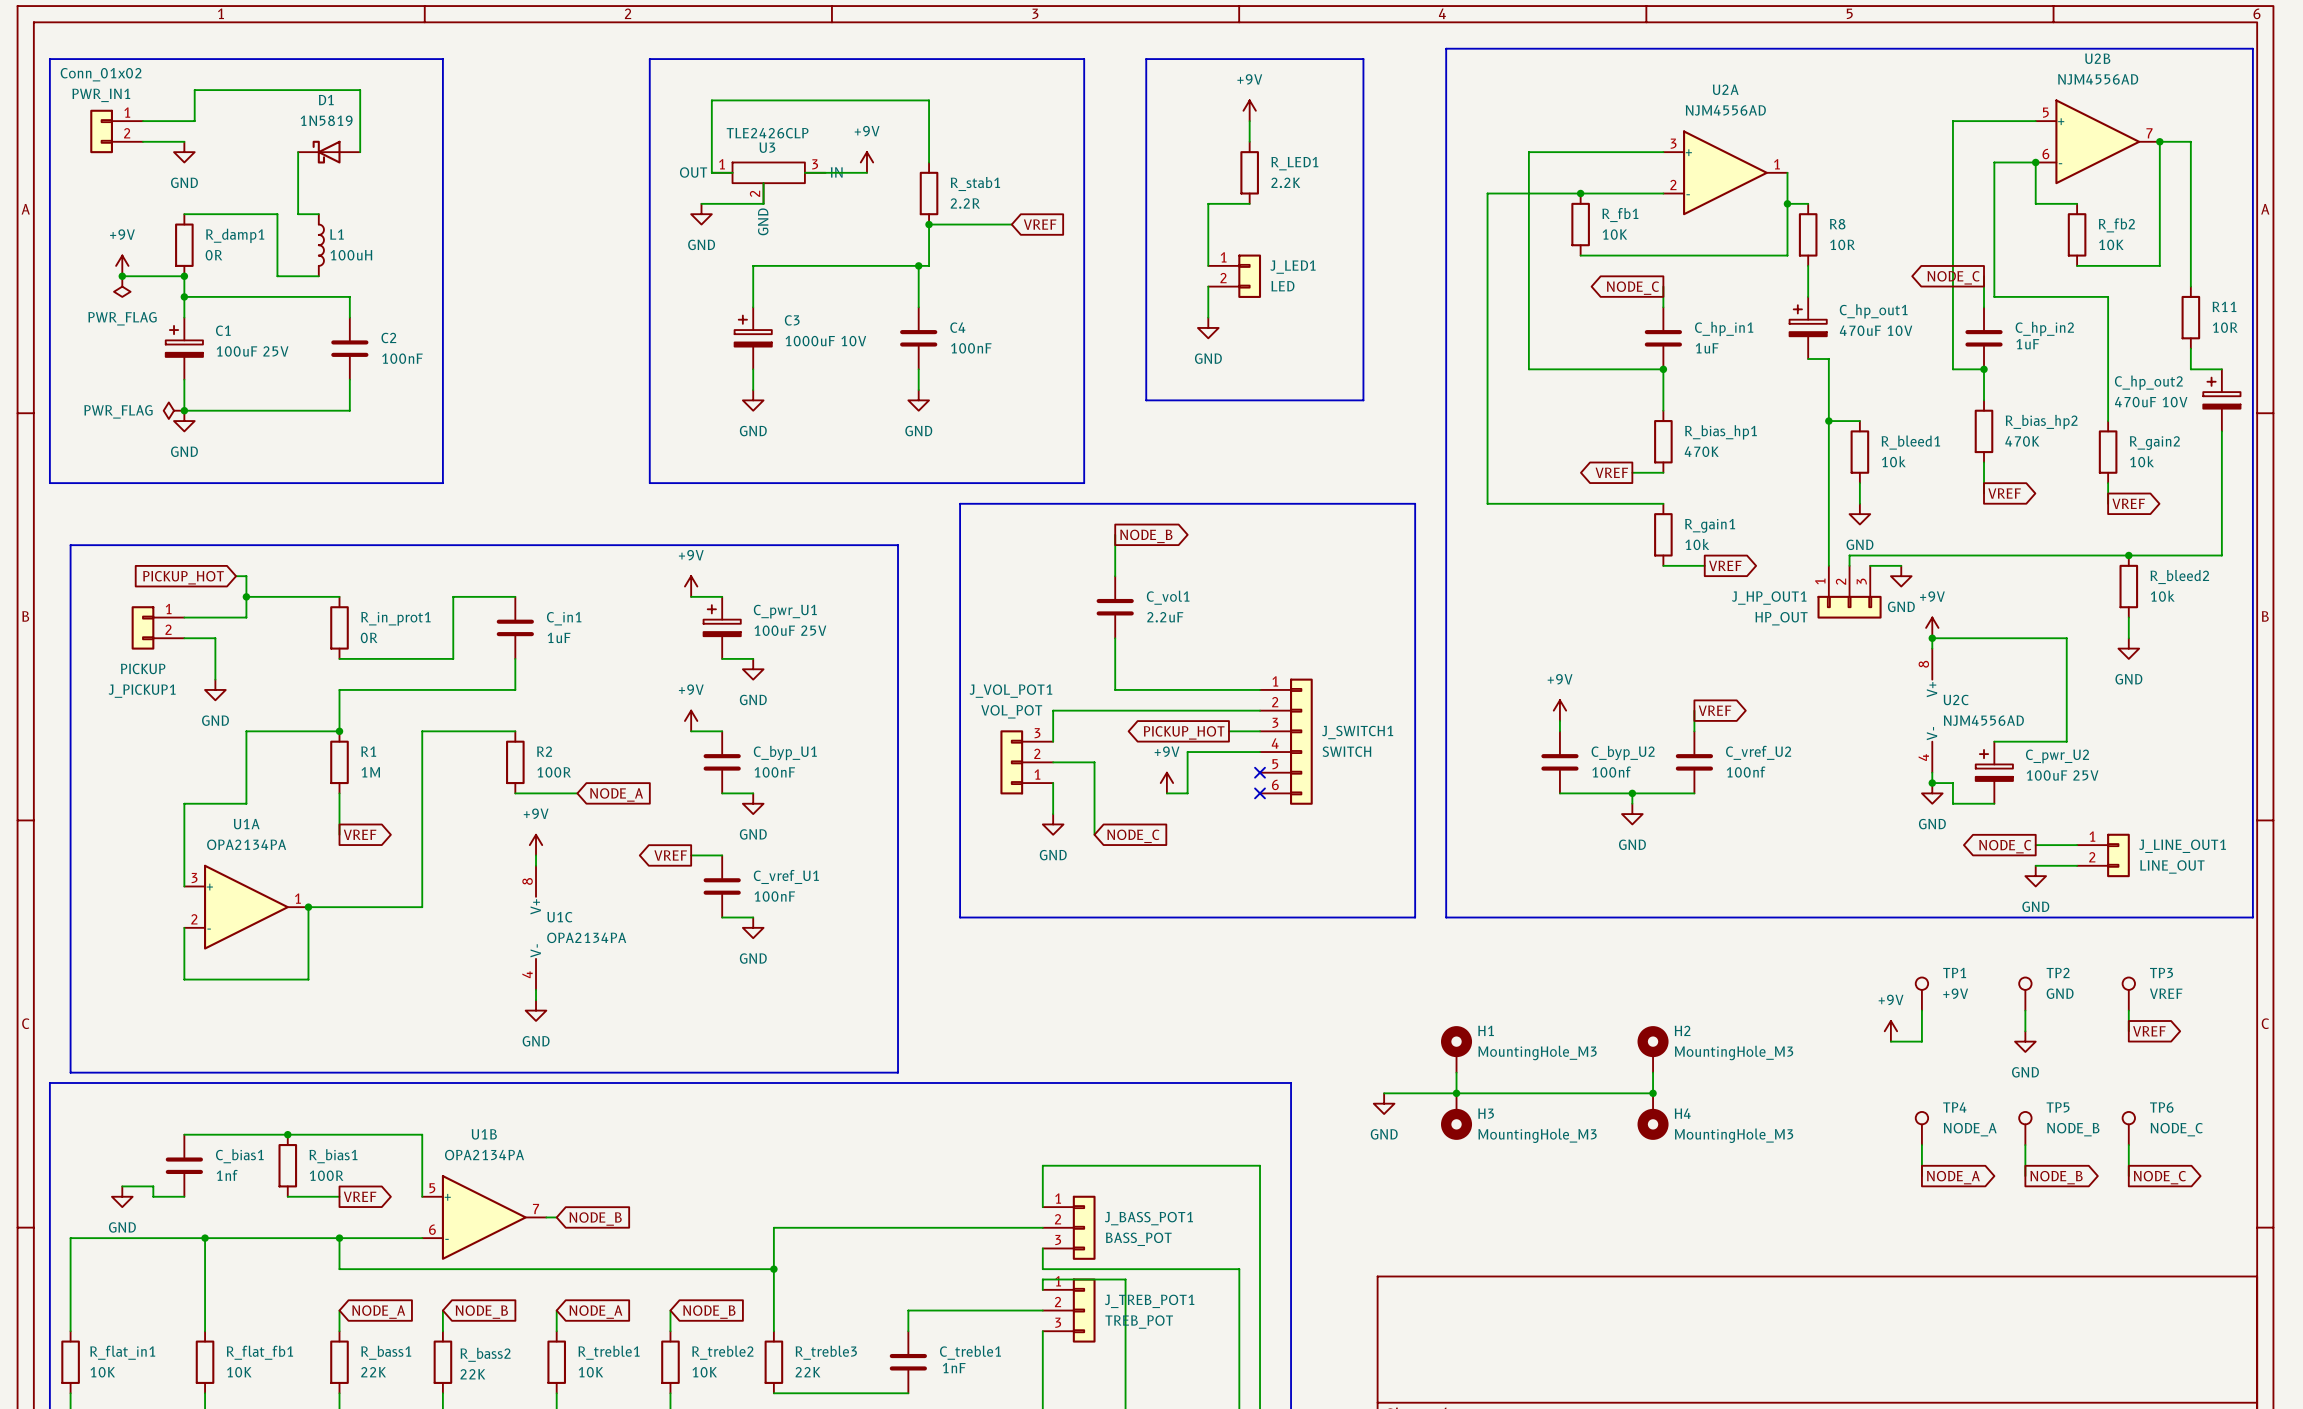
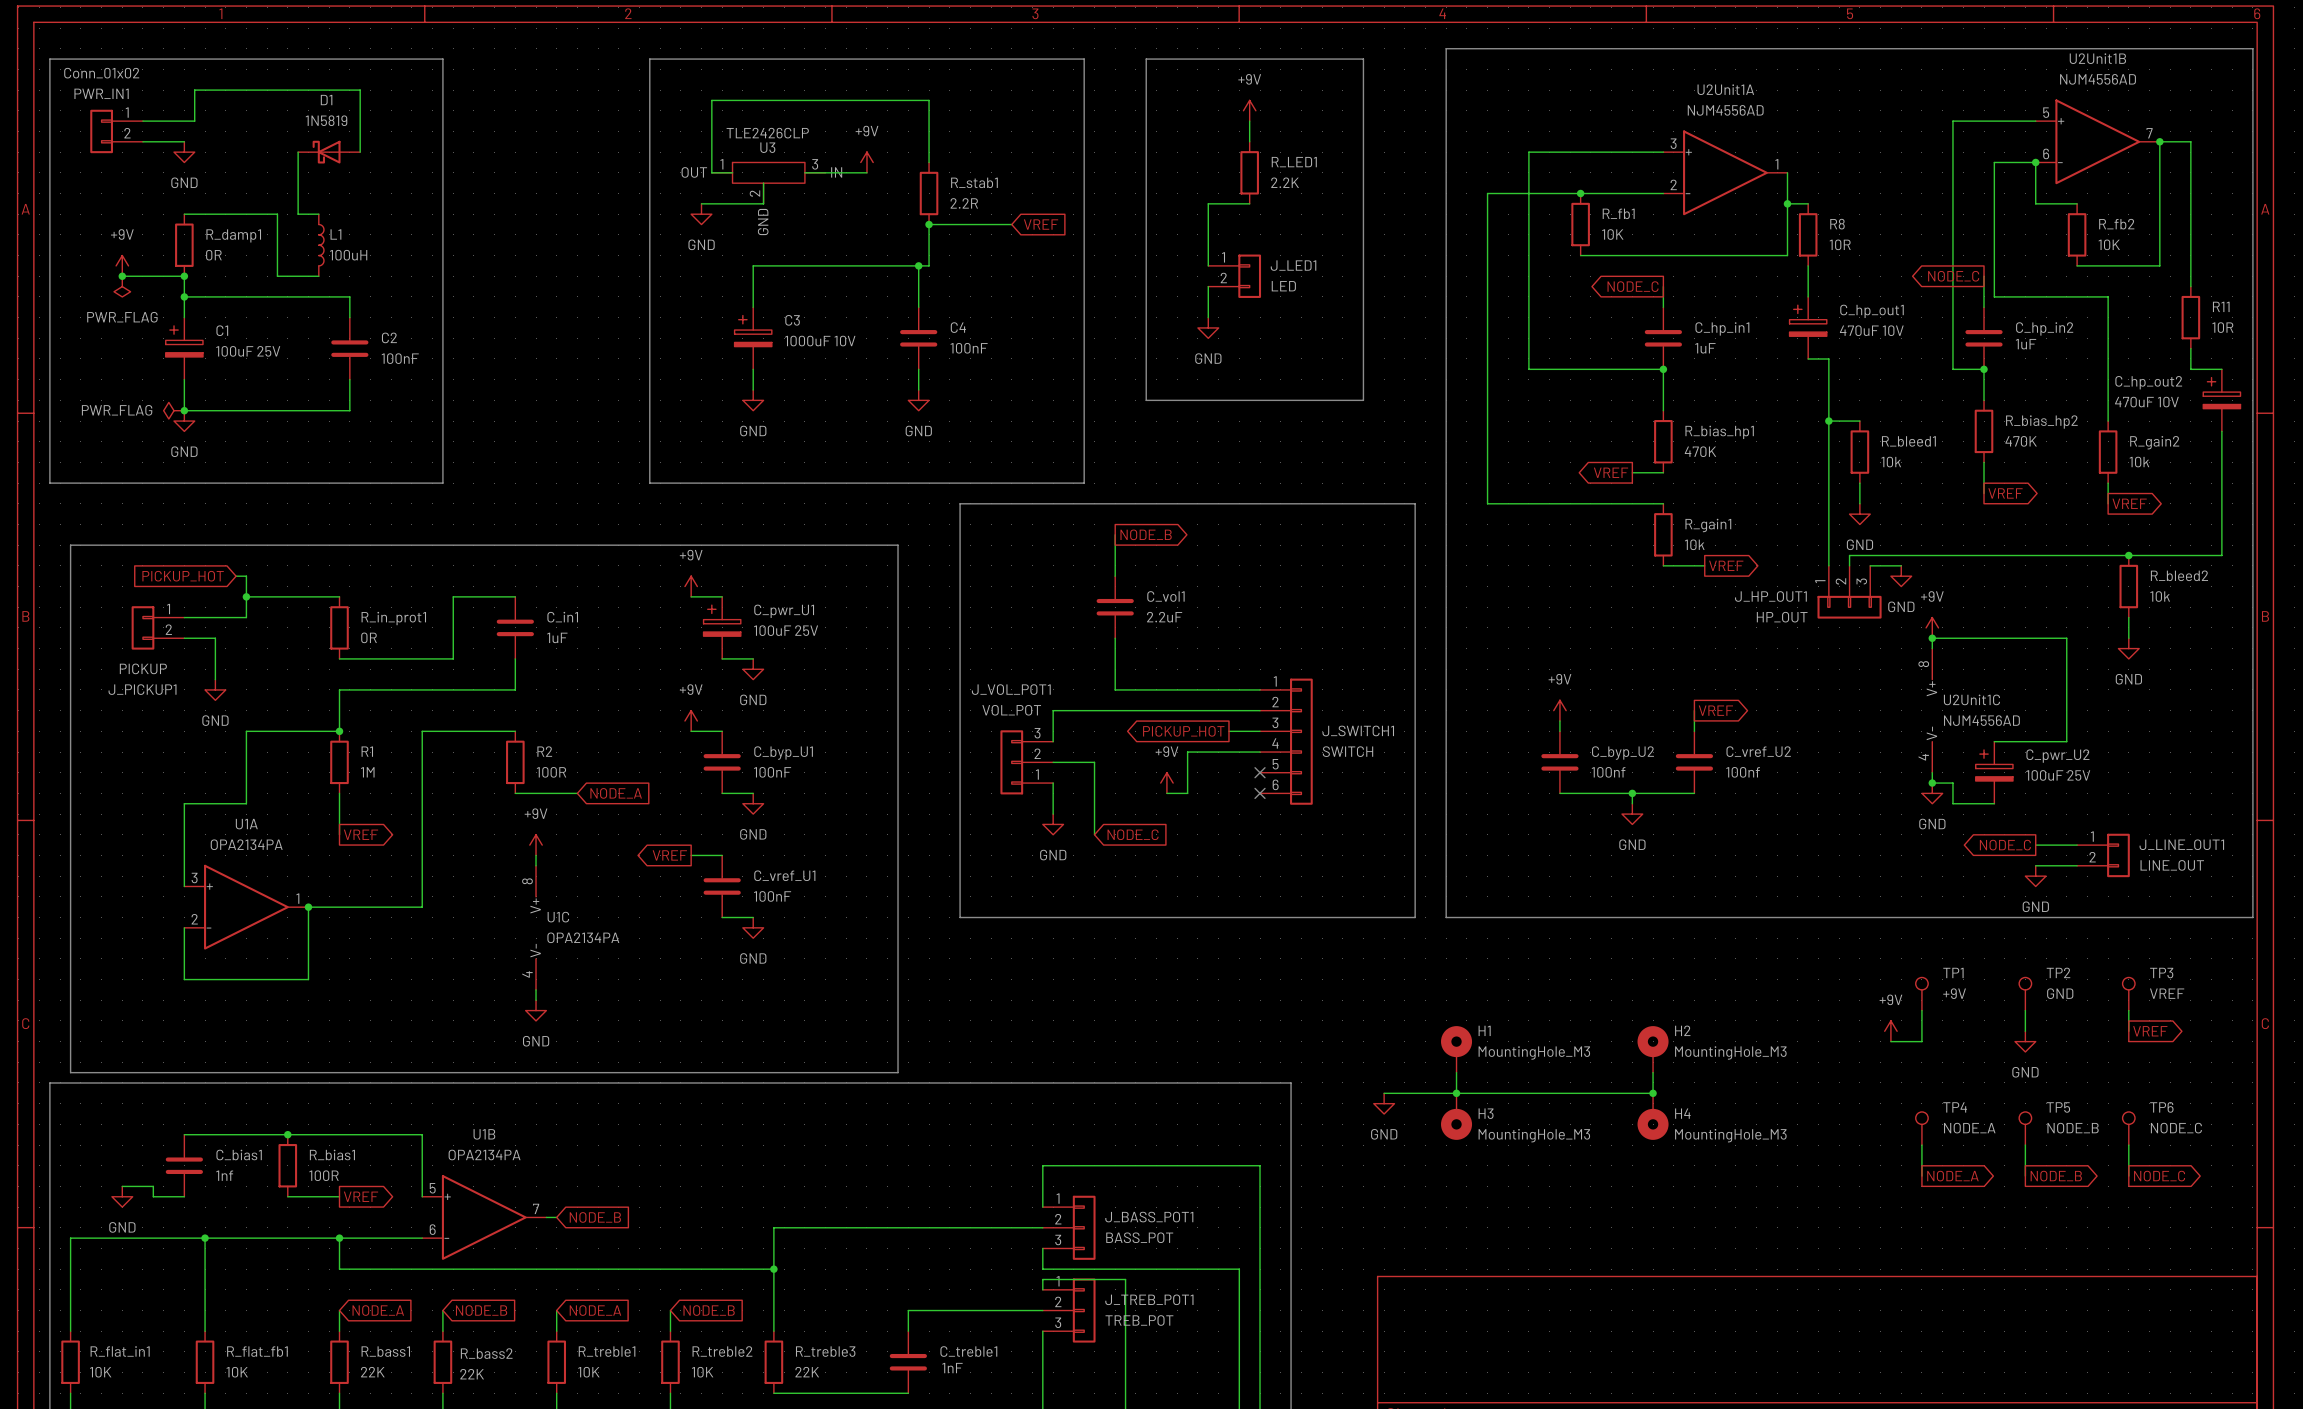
U2B name: U2B (2097, 58) -> U2Unit1B (2097, 58)
U2A name: U2A (1725, 89) -> U2Unit1A (1725, 89)
U2C name: U2C (1956, 699) -> U2Unit1C (1971, 699)

